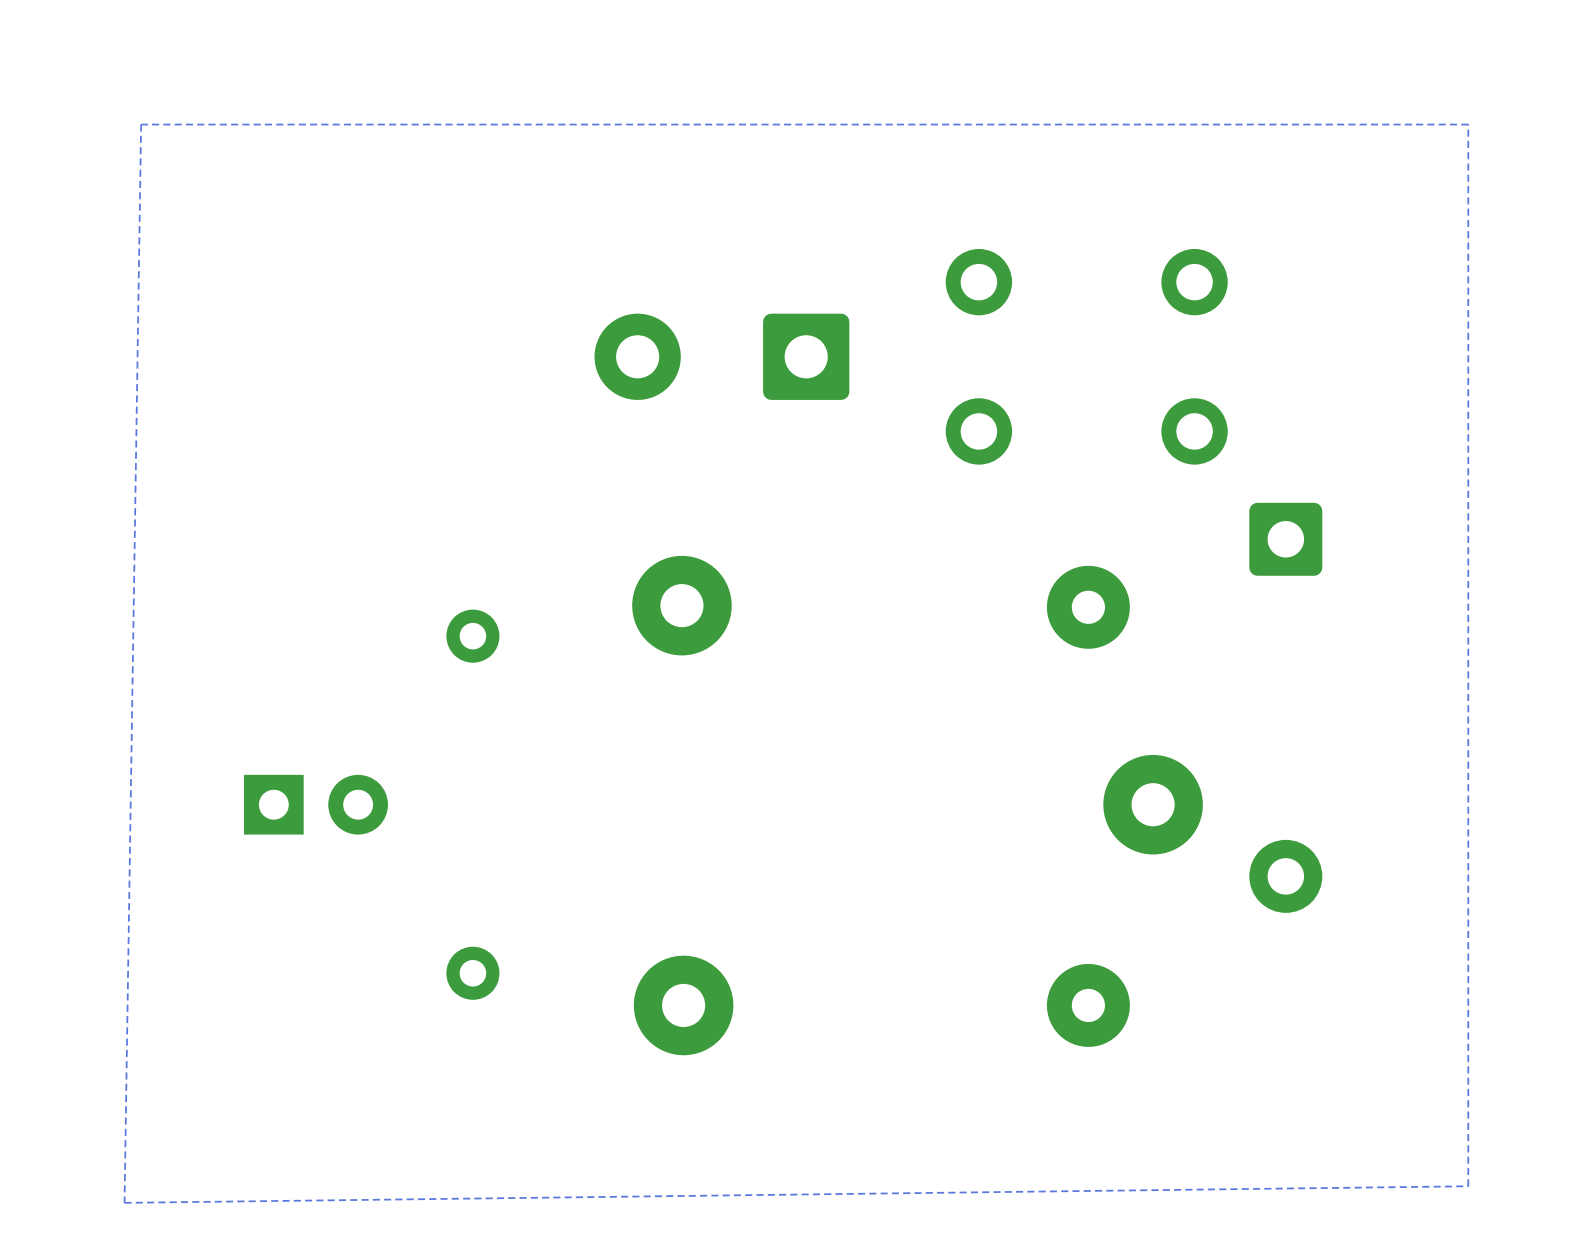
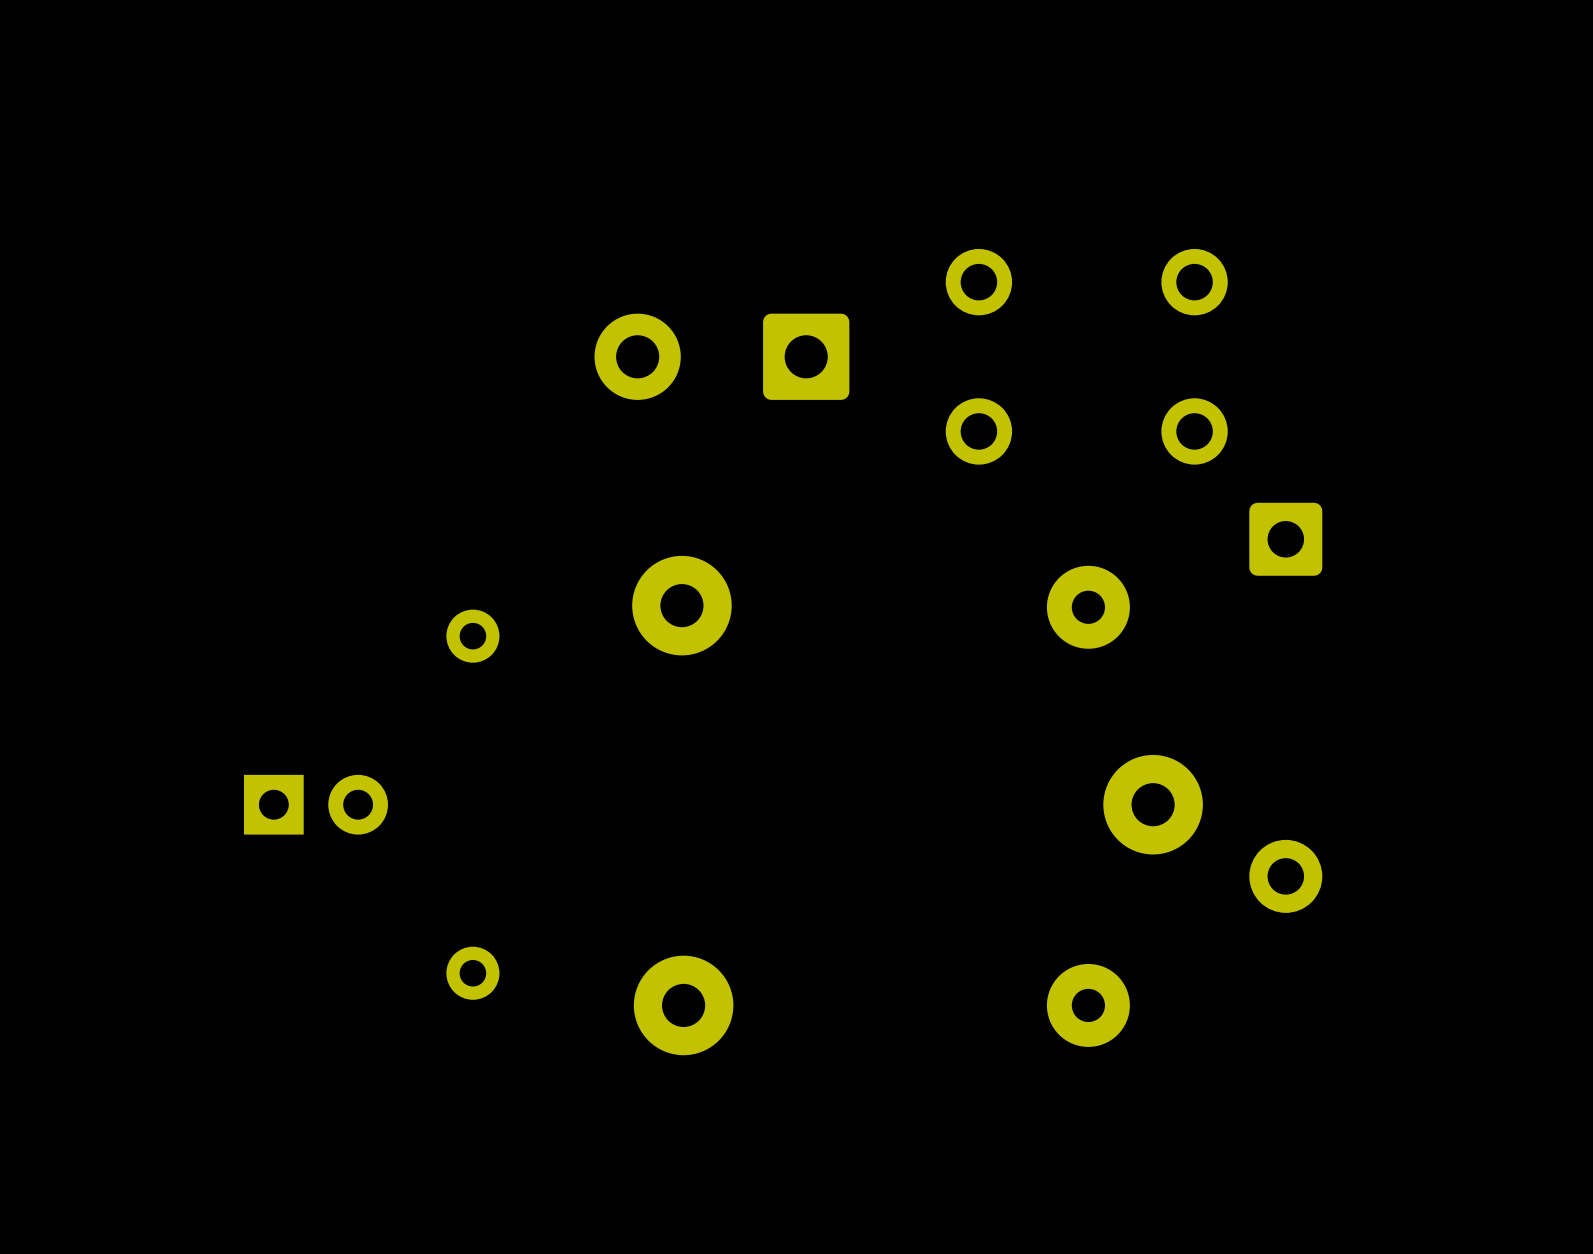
zone outline: (1468, 124) (141, 124) (124, 1202) (1468, 1186) (1468, 124) -> none

